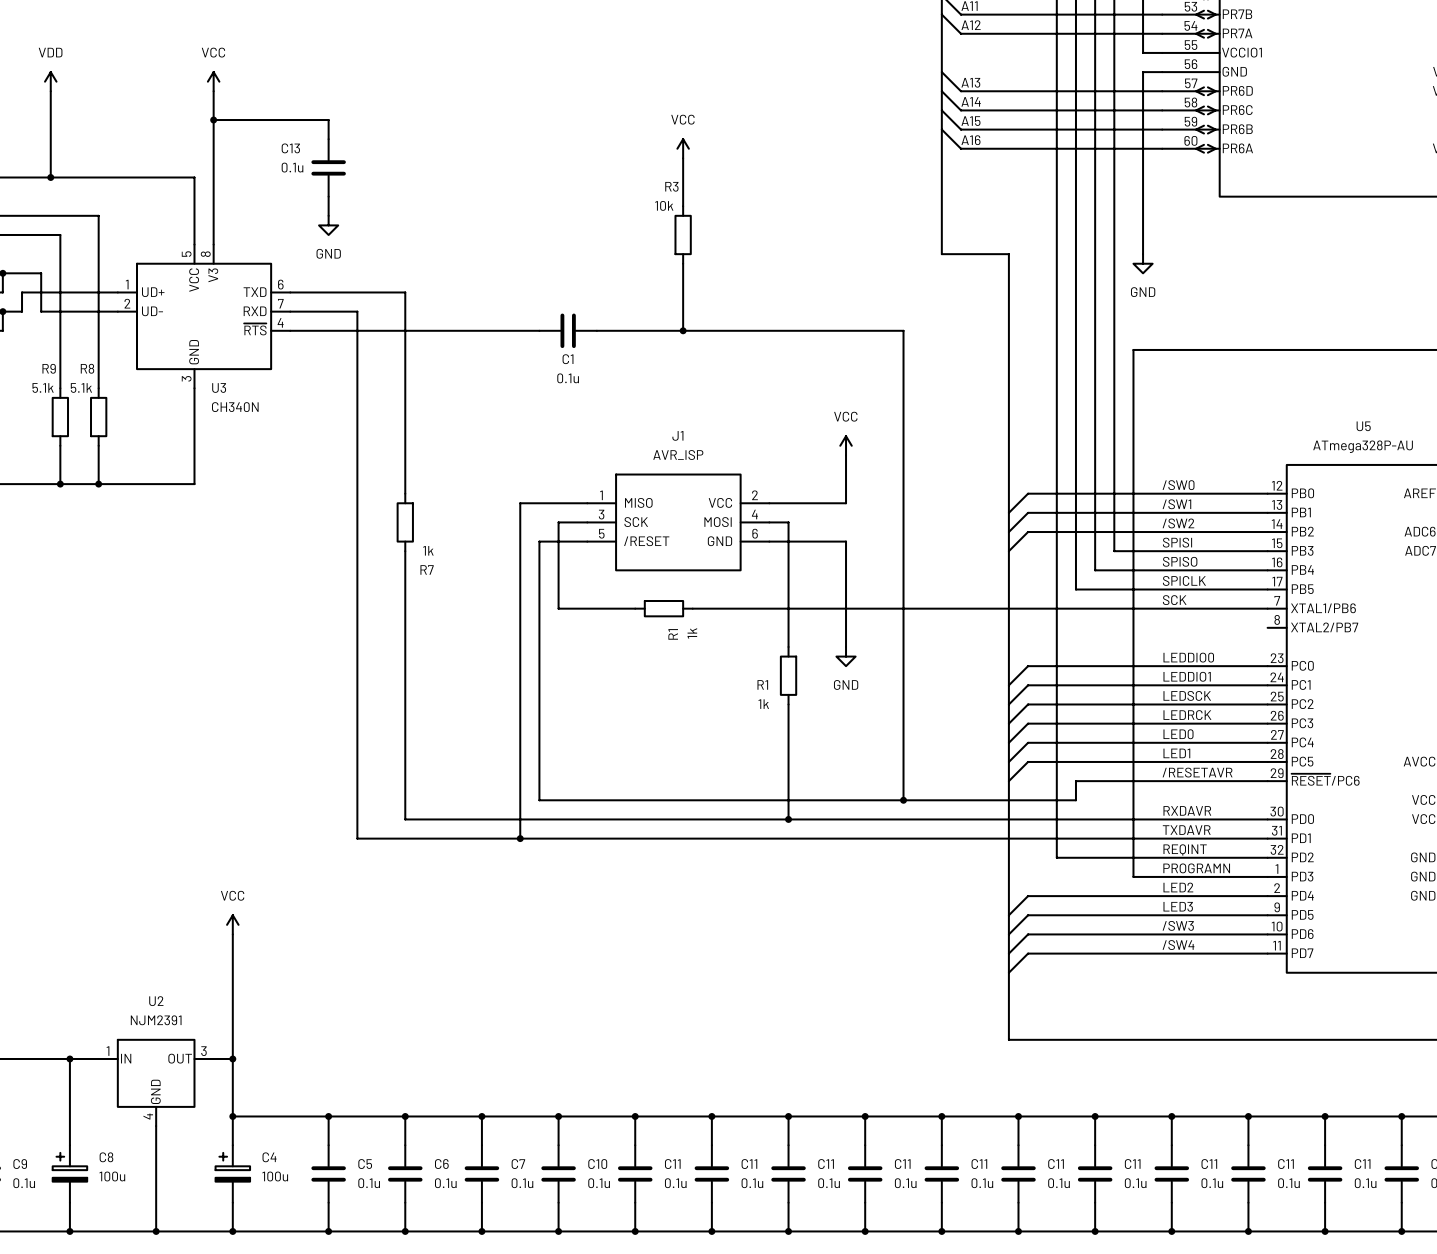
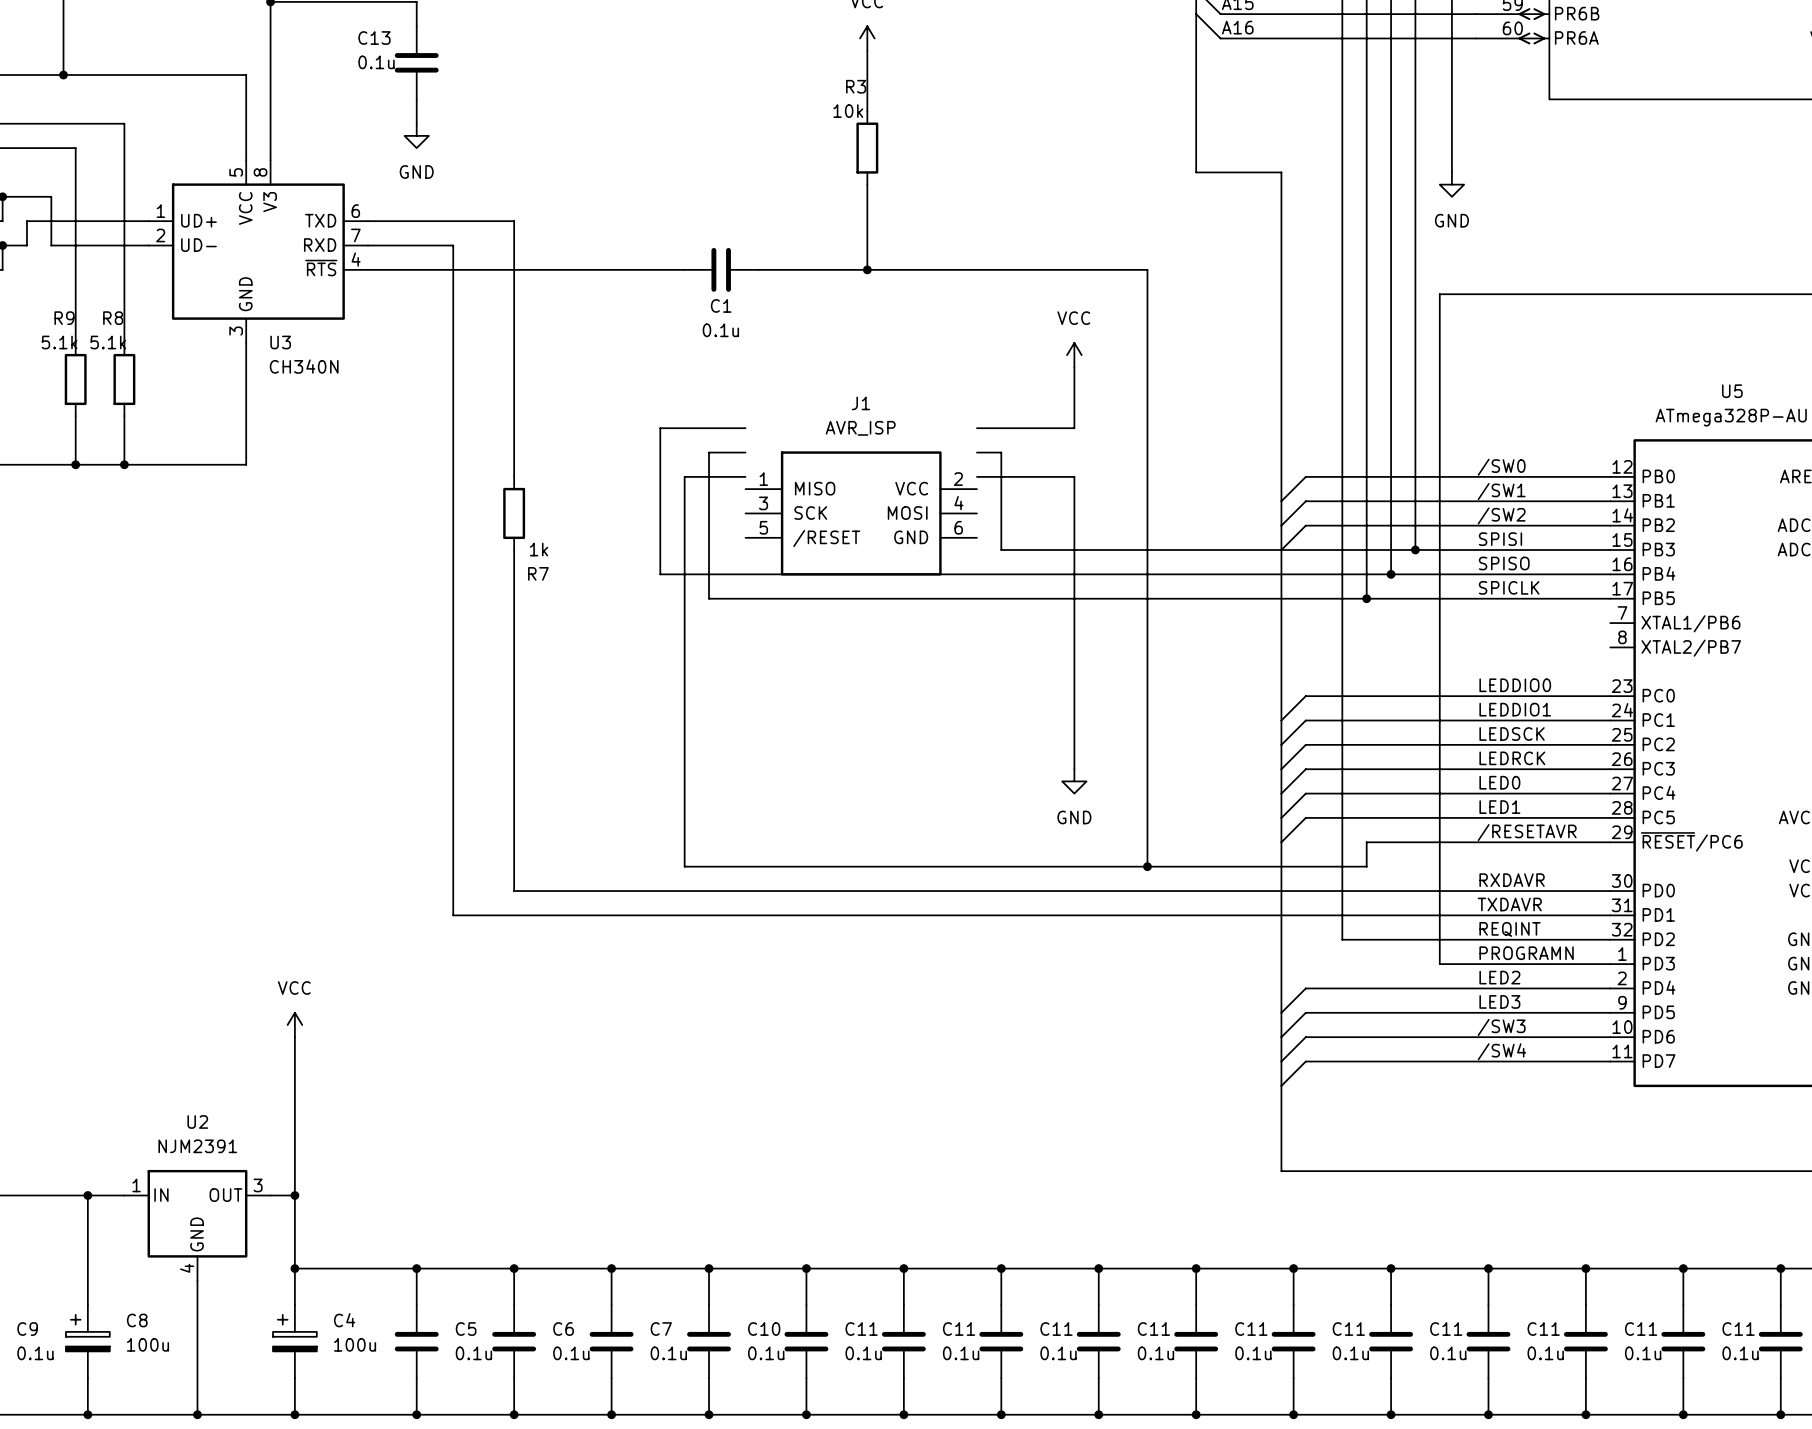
wire: none -> (1074, 367) (1074, 428) (976, 428)
power symbol position: VCC (846, 445) -> VCC (1074, 355)
wire: (846, 455) (846, 493) -> (976, 476) (1074, 476)
wire: (520, 503) (587, 503) -> (660, 489) (660, 428) (745, 428)
wire: (769, 503) (846, 503) -> (1074, 537) (1074, 489)
wire: (558, 522) (587, 522) -> (709, 513) (709, 452) (745, 452)
wire: (769, 522) (788, 522) -> (976, 452) (1001, 452) (1001, 513)
wire: (539, 541) (587, 541) -> (684, 537) (684, 476) (745, 476)
wire: (769, 541) (846, 541) -> none
wire: (788, 551) (788, 646) -> (1001, 550) (1415, 550)
junction: none -> (1415, 550)
wire: (520, 570) (520, 838) -> (660, 574) (1391, 574)
junction: none -> (1391, 574)
wire: (558, 589) (558, 608) (635, 608) -> (709, 598) (1366, 598)
junction: none -> (1366, 598)
label: SCK (1174, 600) -> none
R1: 1k (663, 608) -> none
wire: (692, 608) (1267, 608) -> none
wire: none -> (1074, 671) (1074, 769)
power symbol position: GND (846, 656) -> GND (1074, 781)
R1: 1k (788, 675) -> none
wire: (788, 704) (788, 819) -> none
junction: (788, 819) -> none
junction: (520, 838) -> none

